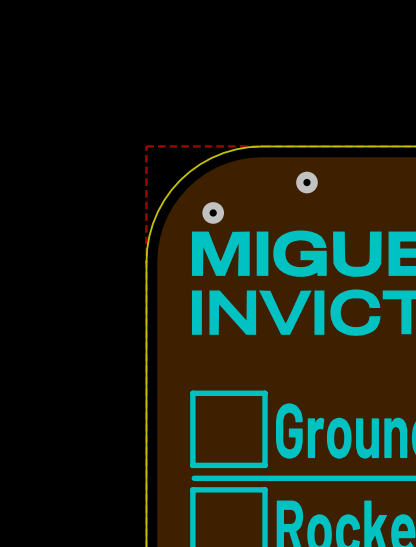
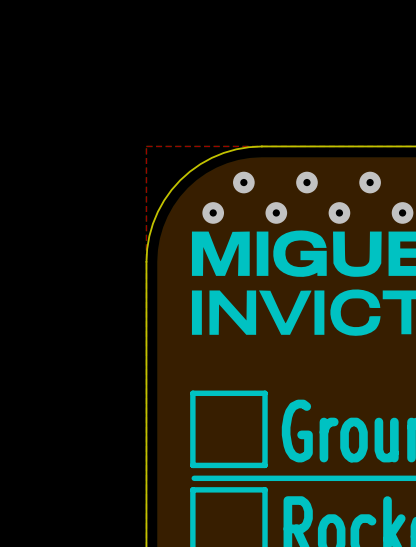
via: none -> (243, 182)
via: none -> (370, 182)
via: none -> (276, 212)
via: none -> (339, 212)
via: none -> (402, 212)

